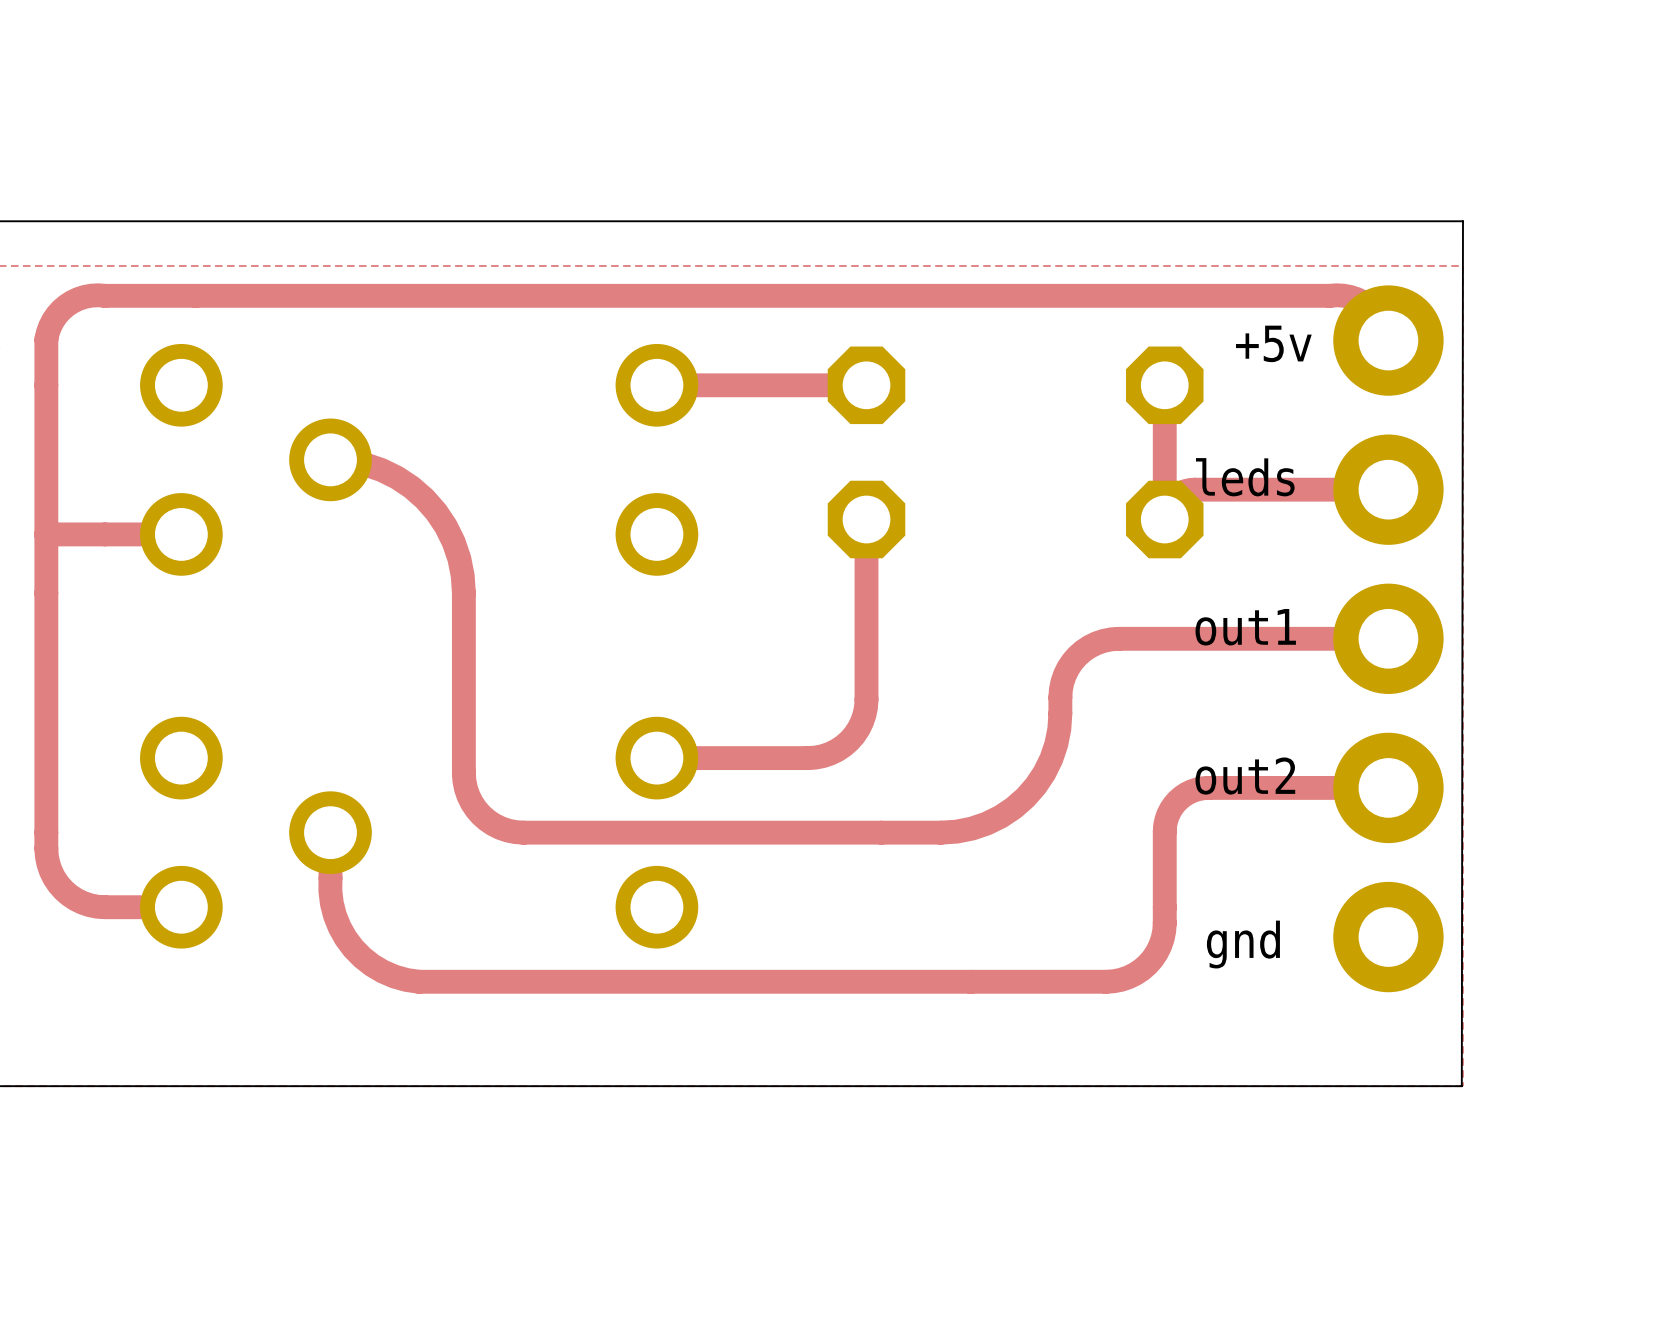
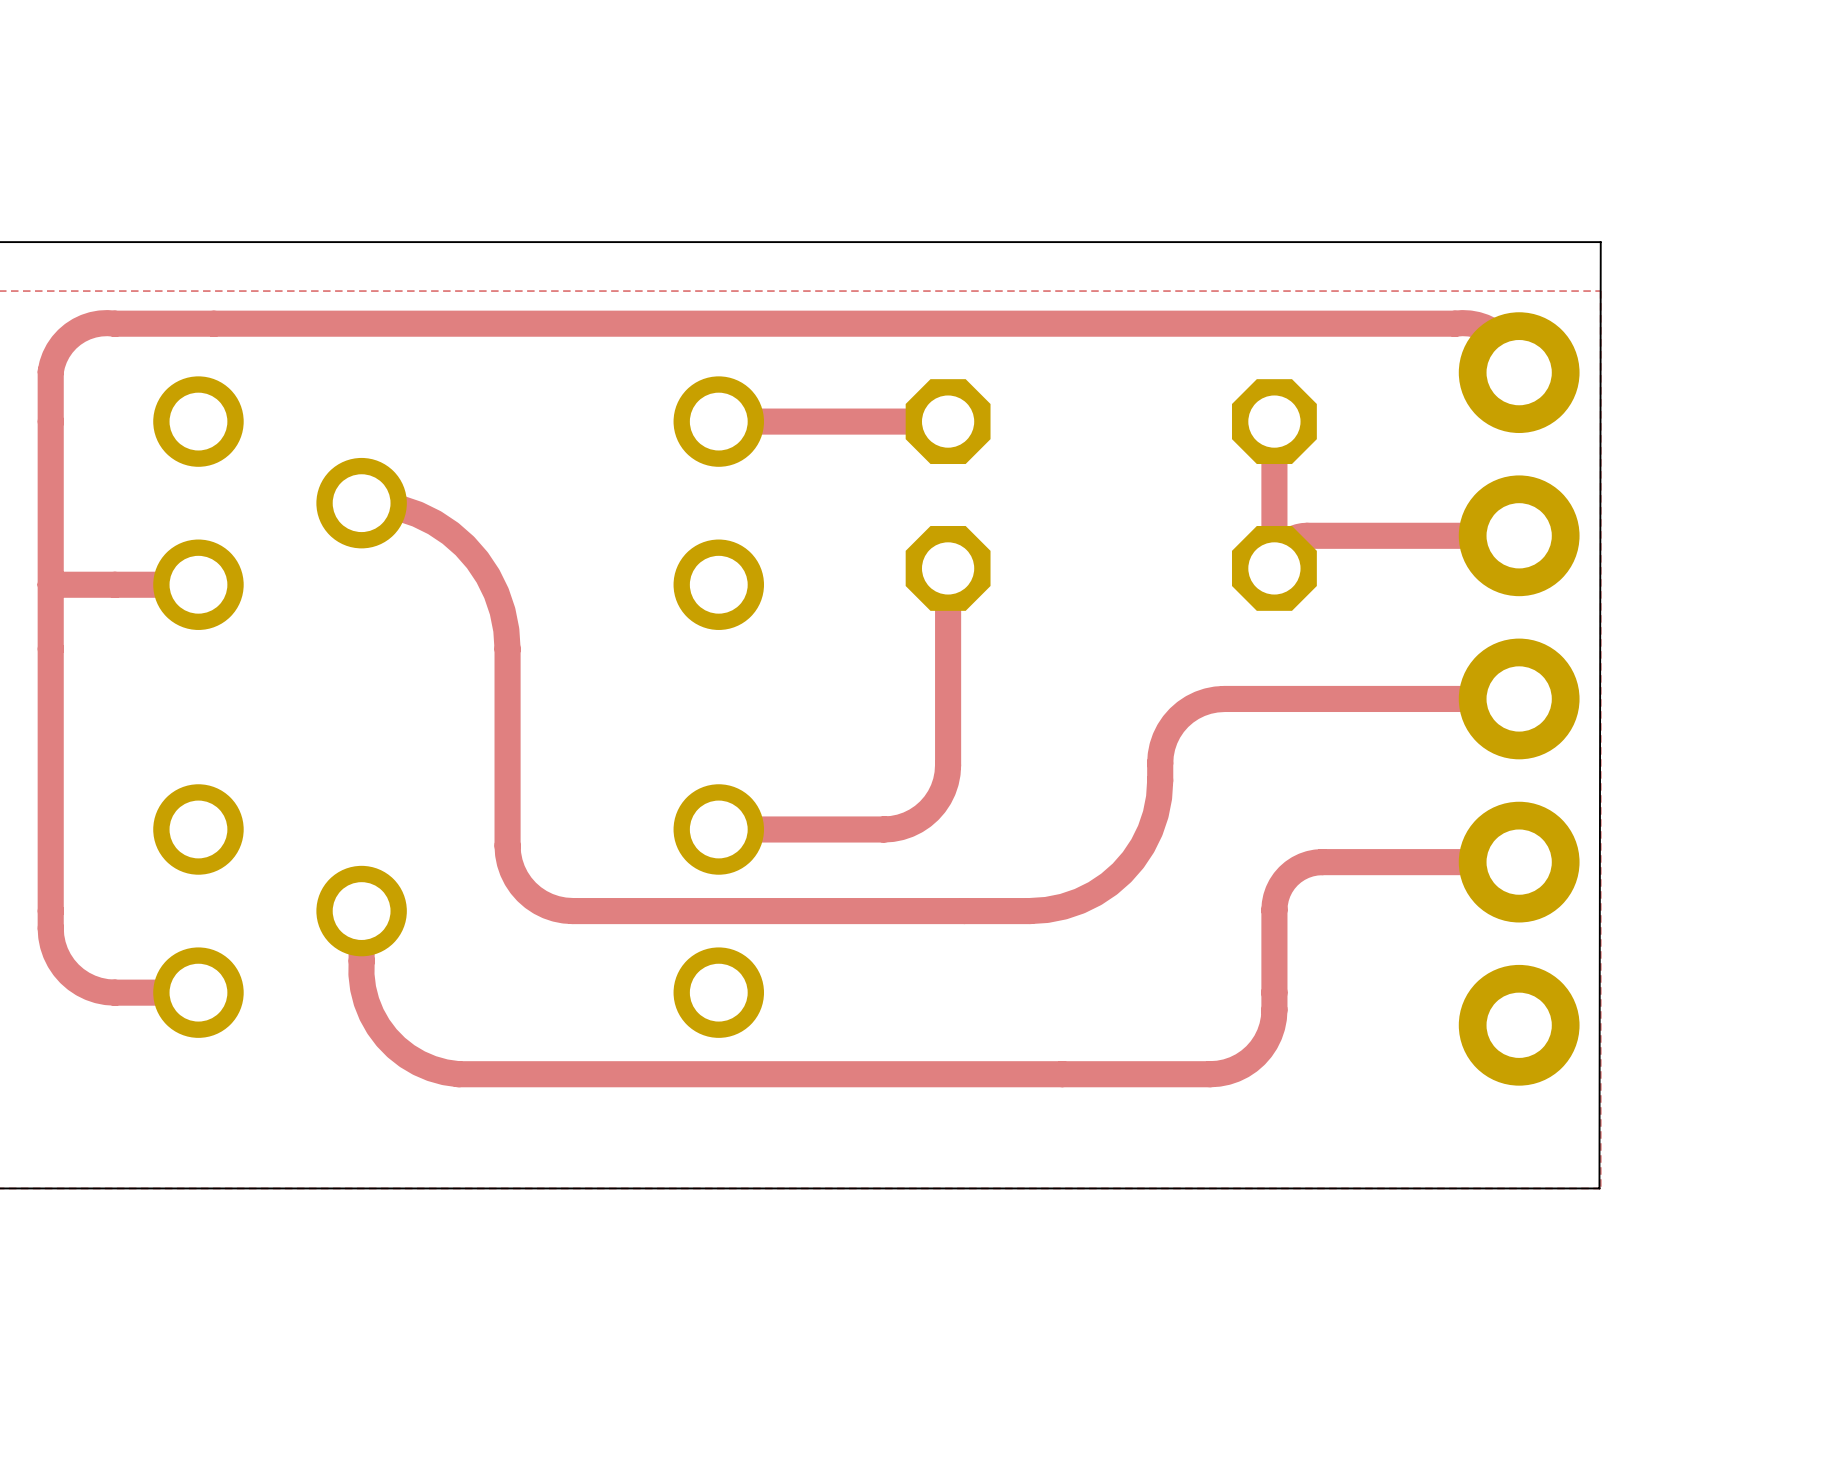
text: +5v (1273, 343) -> none
text: leds (1245, 477) -> none
text: out1 (1245, 627) -> none
text: out2 (1245, 776) -> none
text: gnd (1243, 944) -> none

